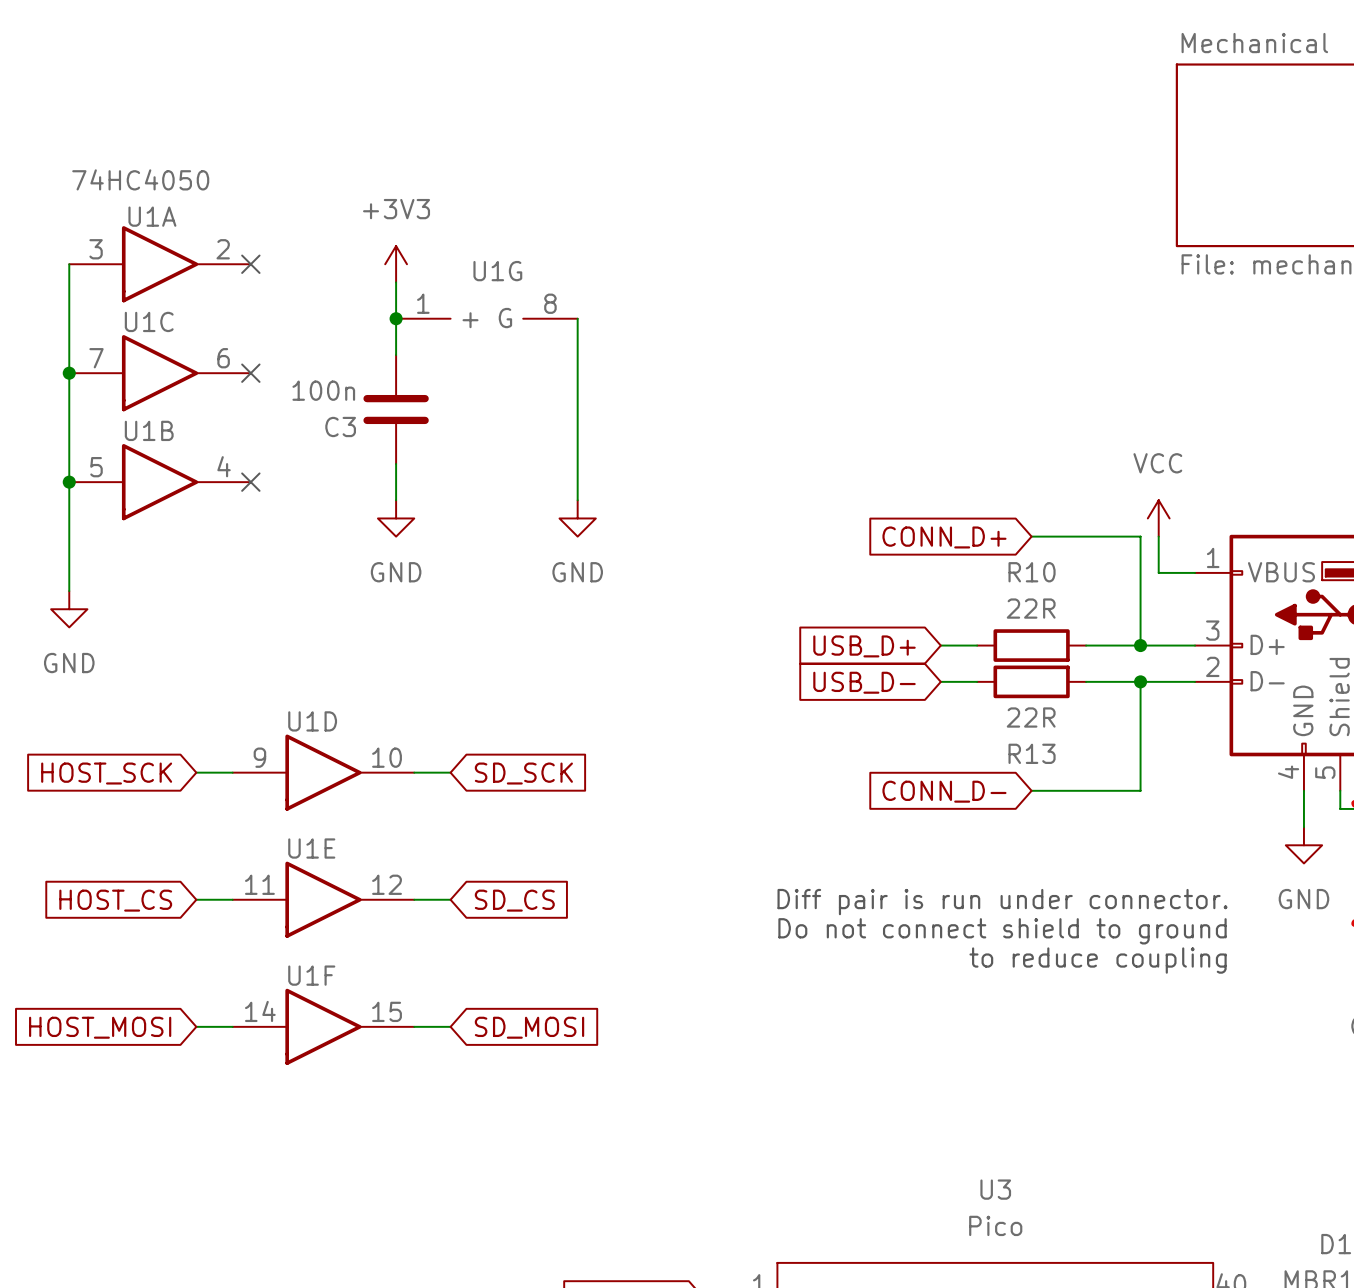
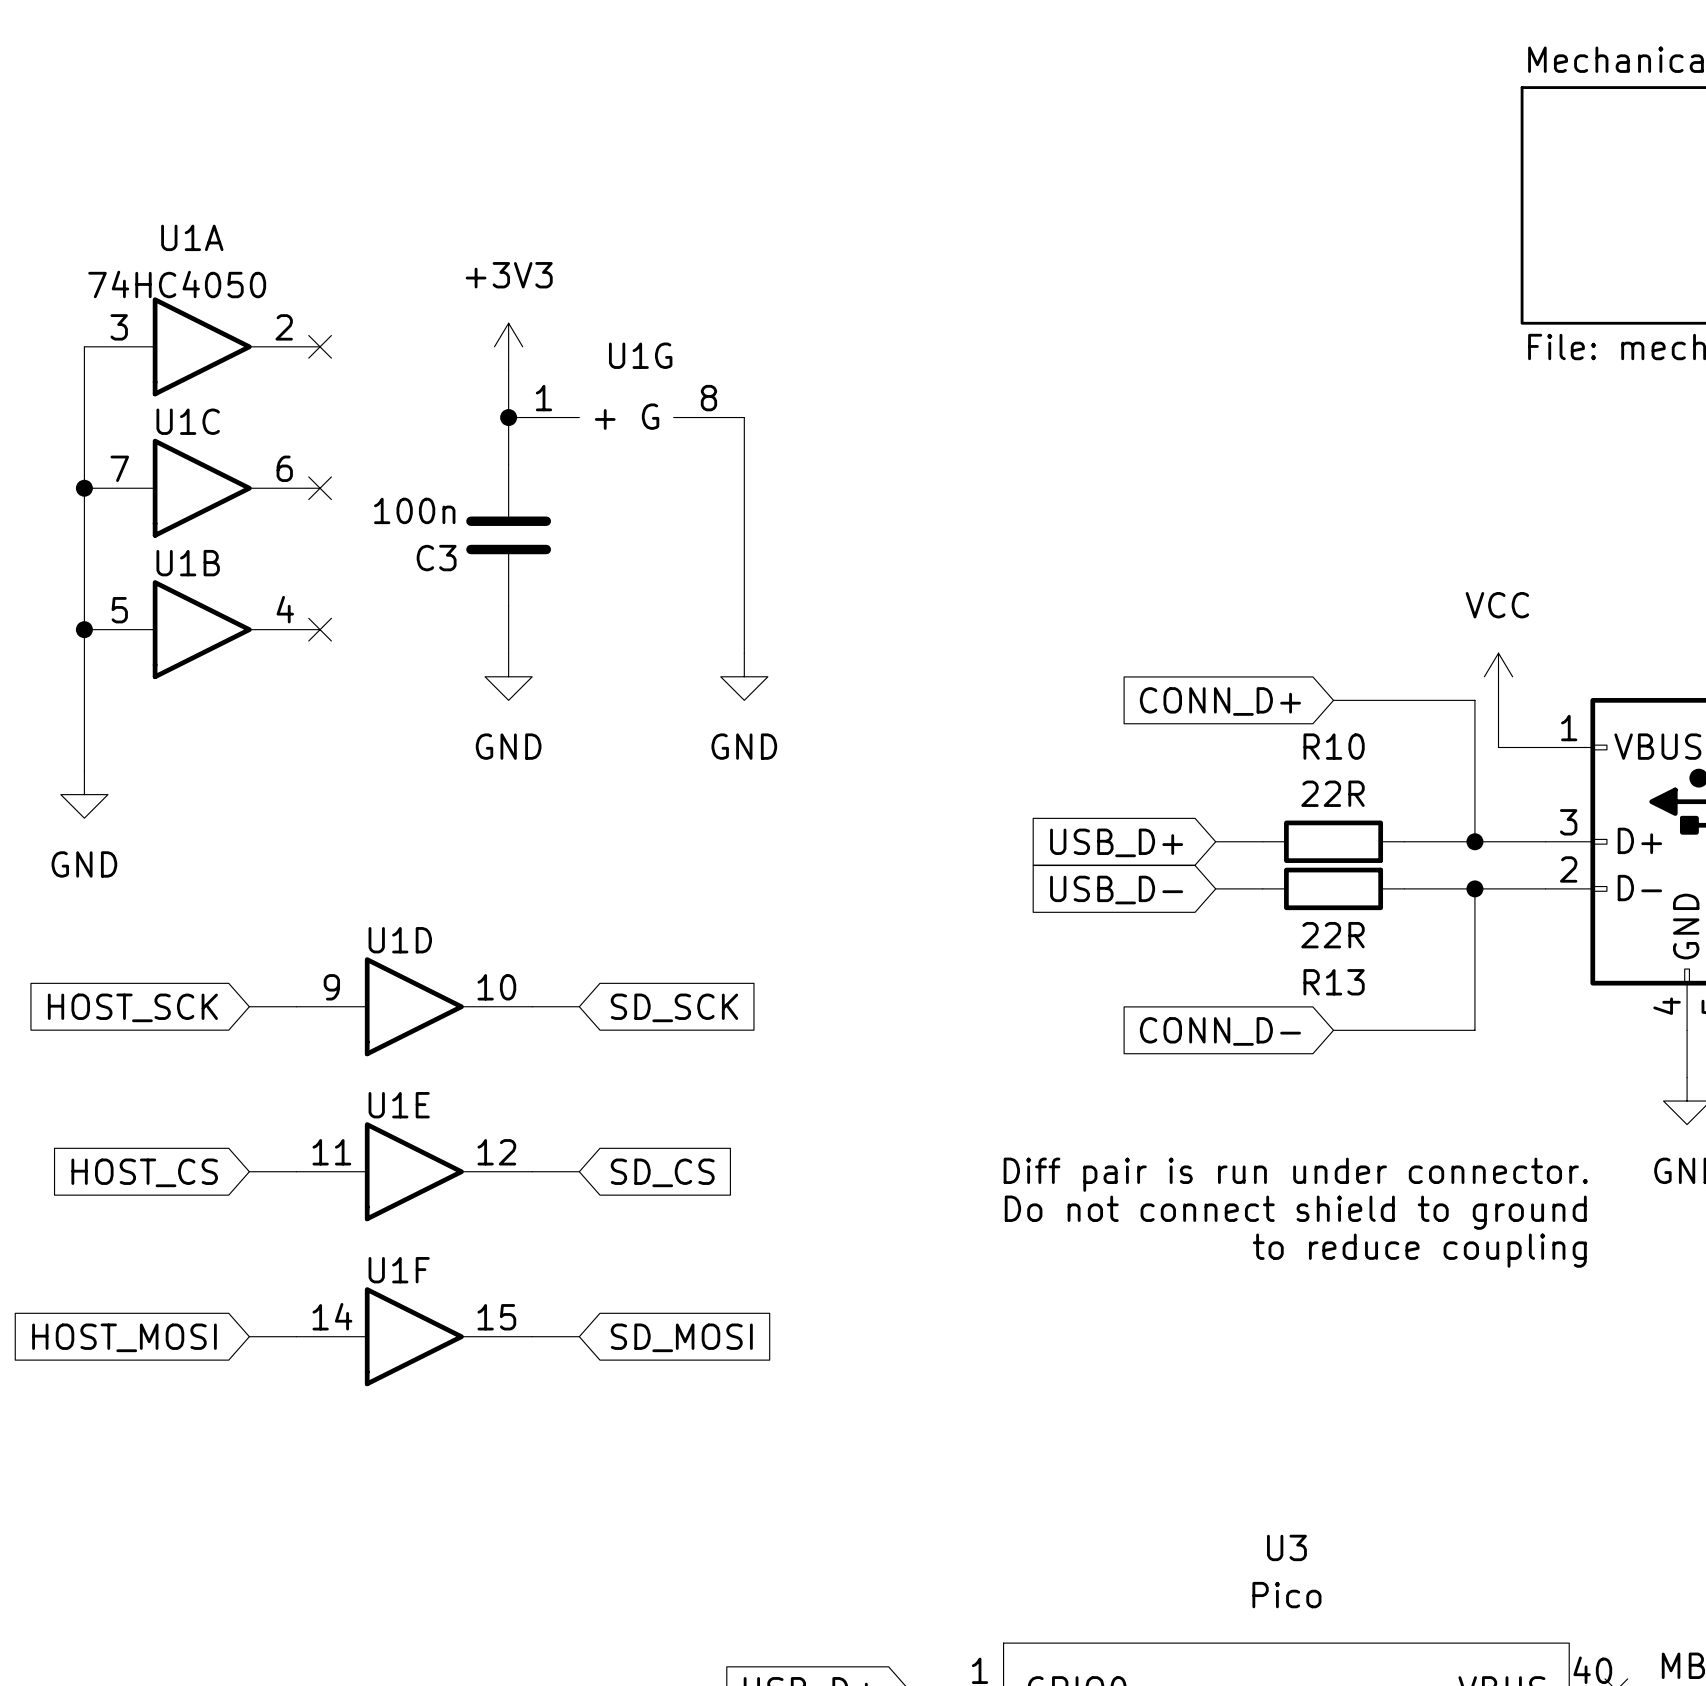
U1A value position: 74HC4050 (140, 179) -> 74HC4050 (177, 284)
U1A name position: U1A (152, 216) -> U1A (192, 237)

